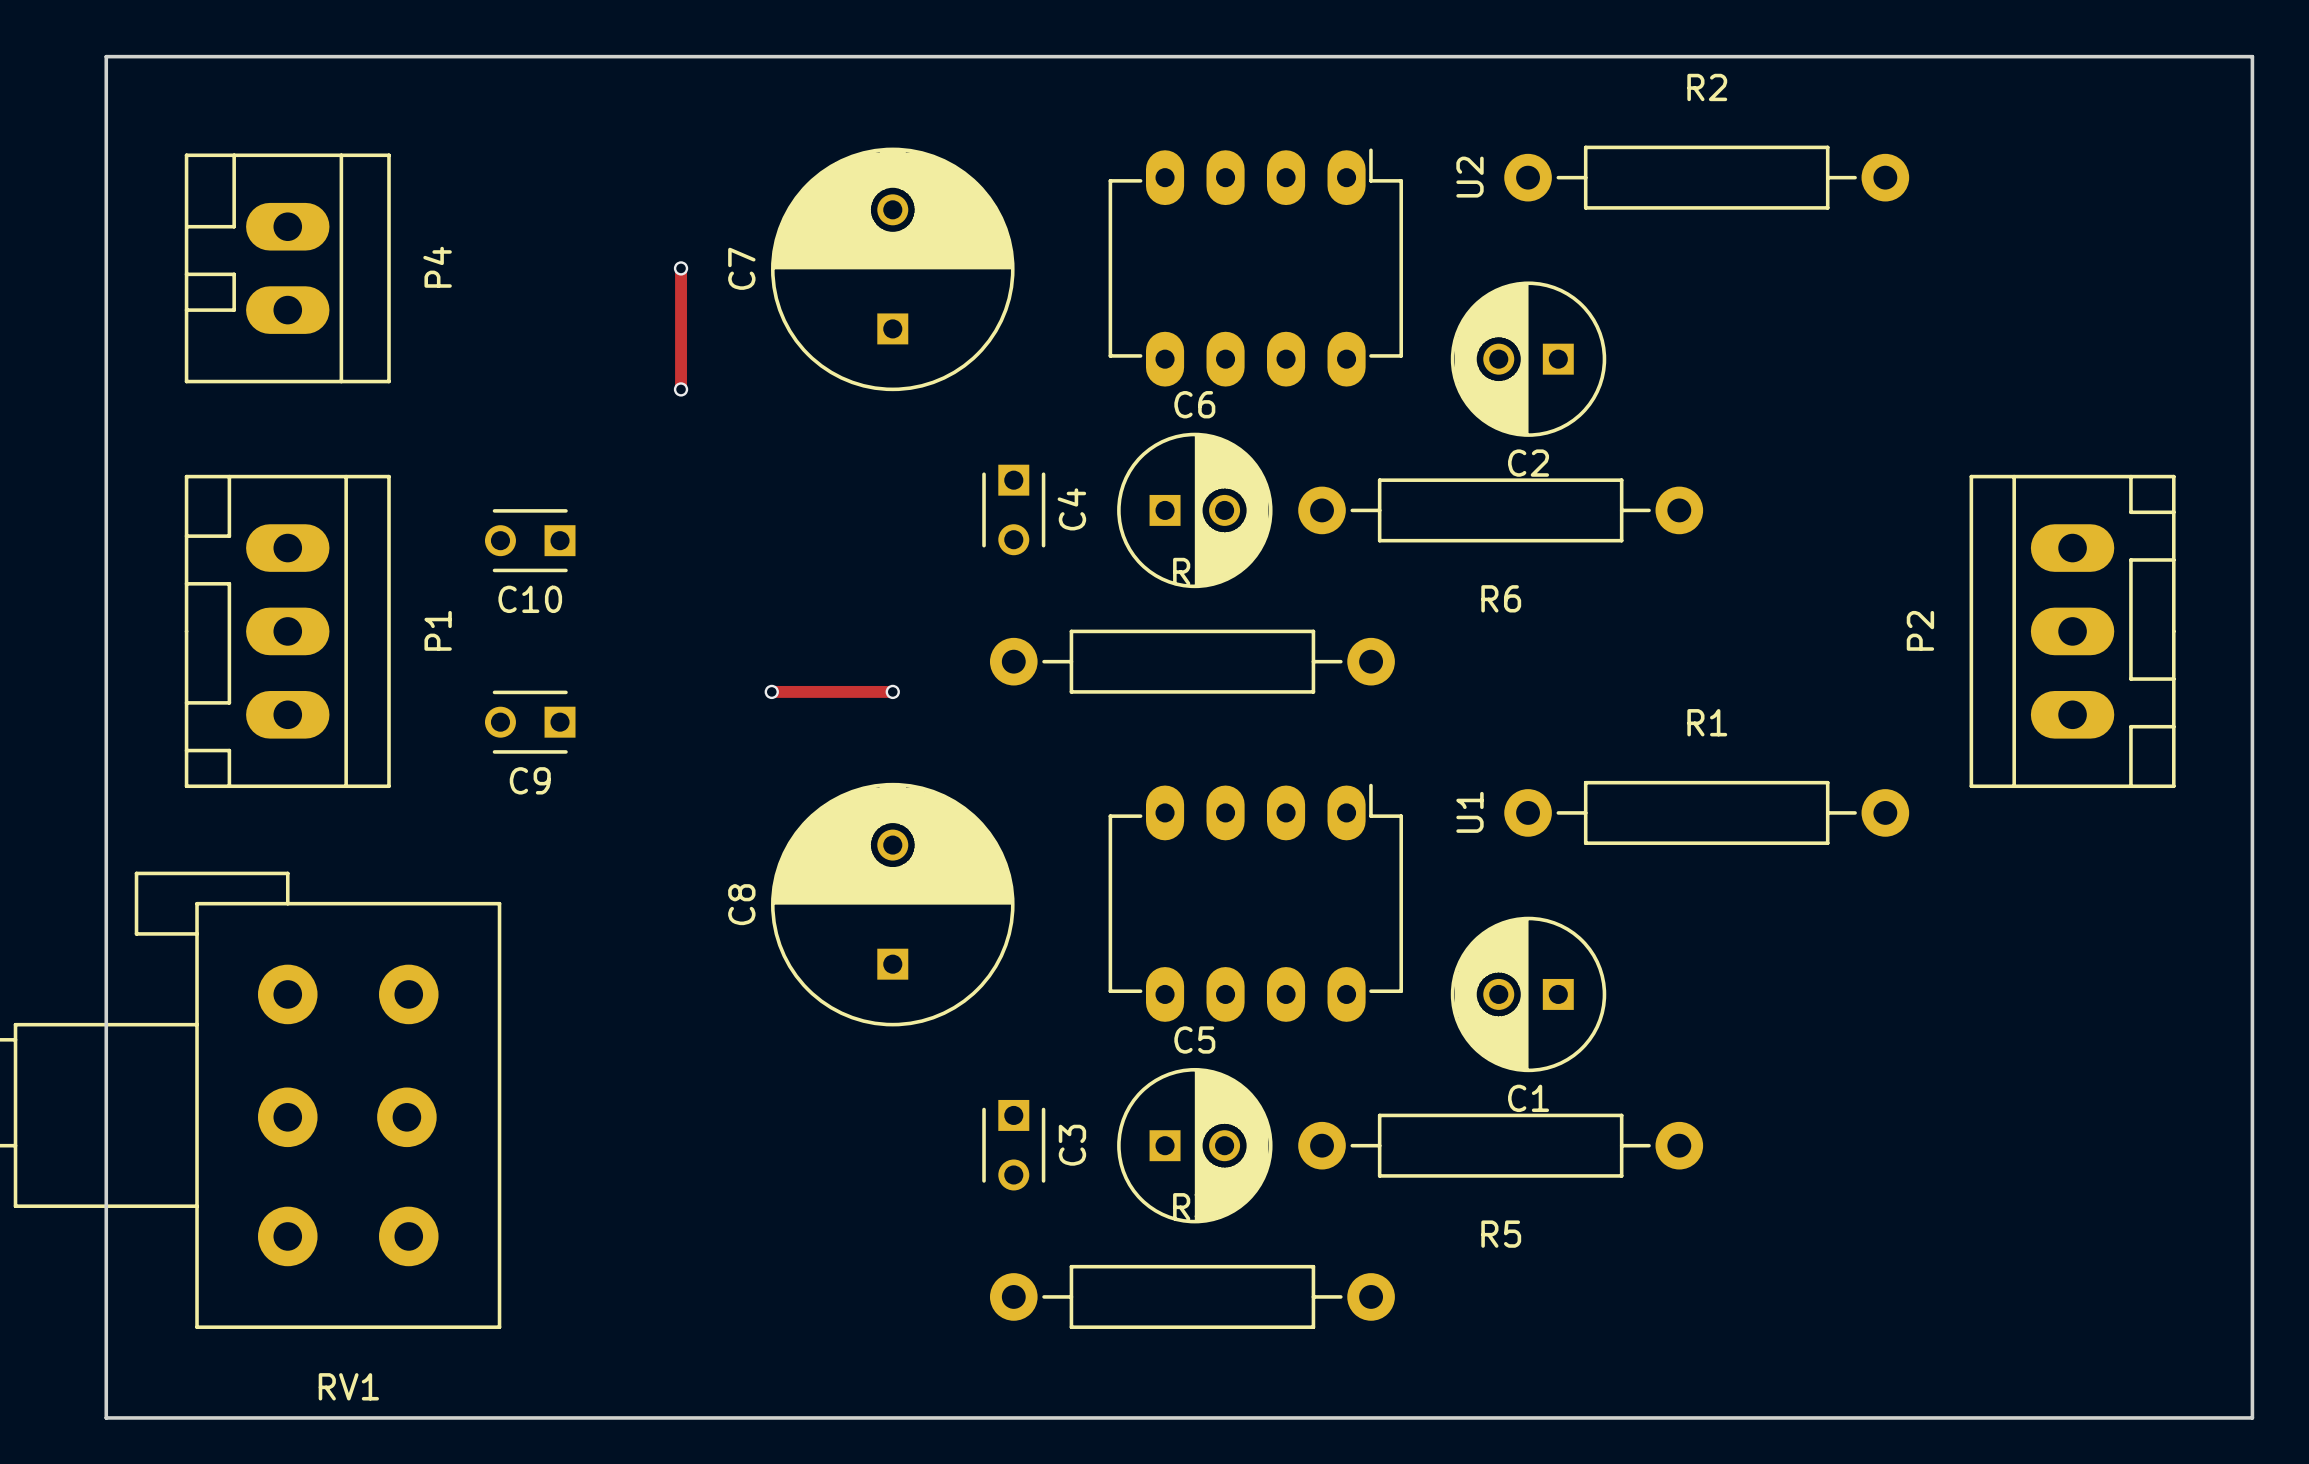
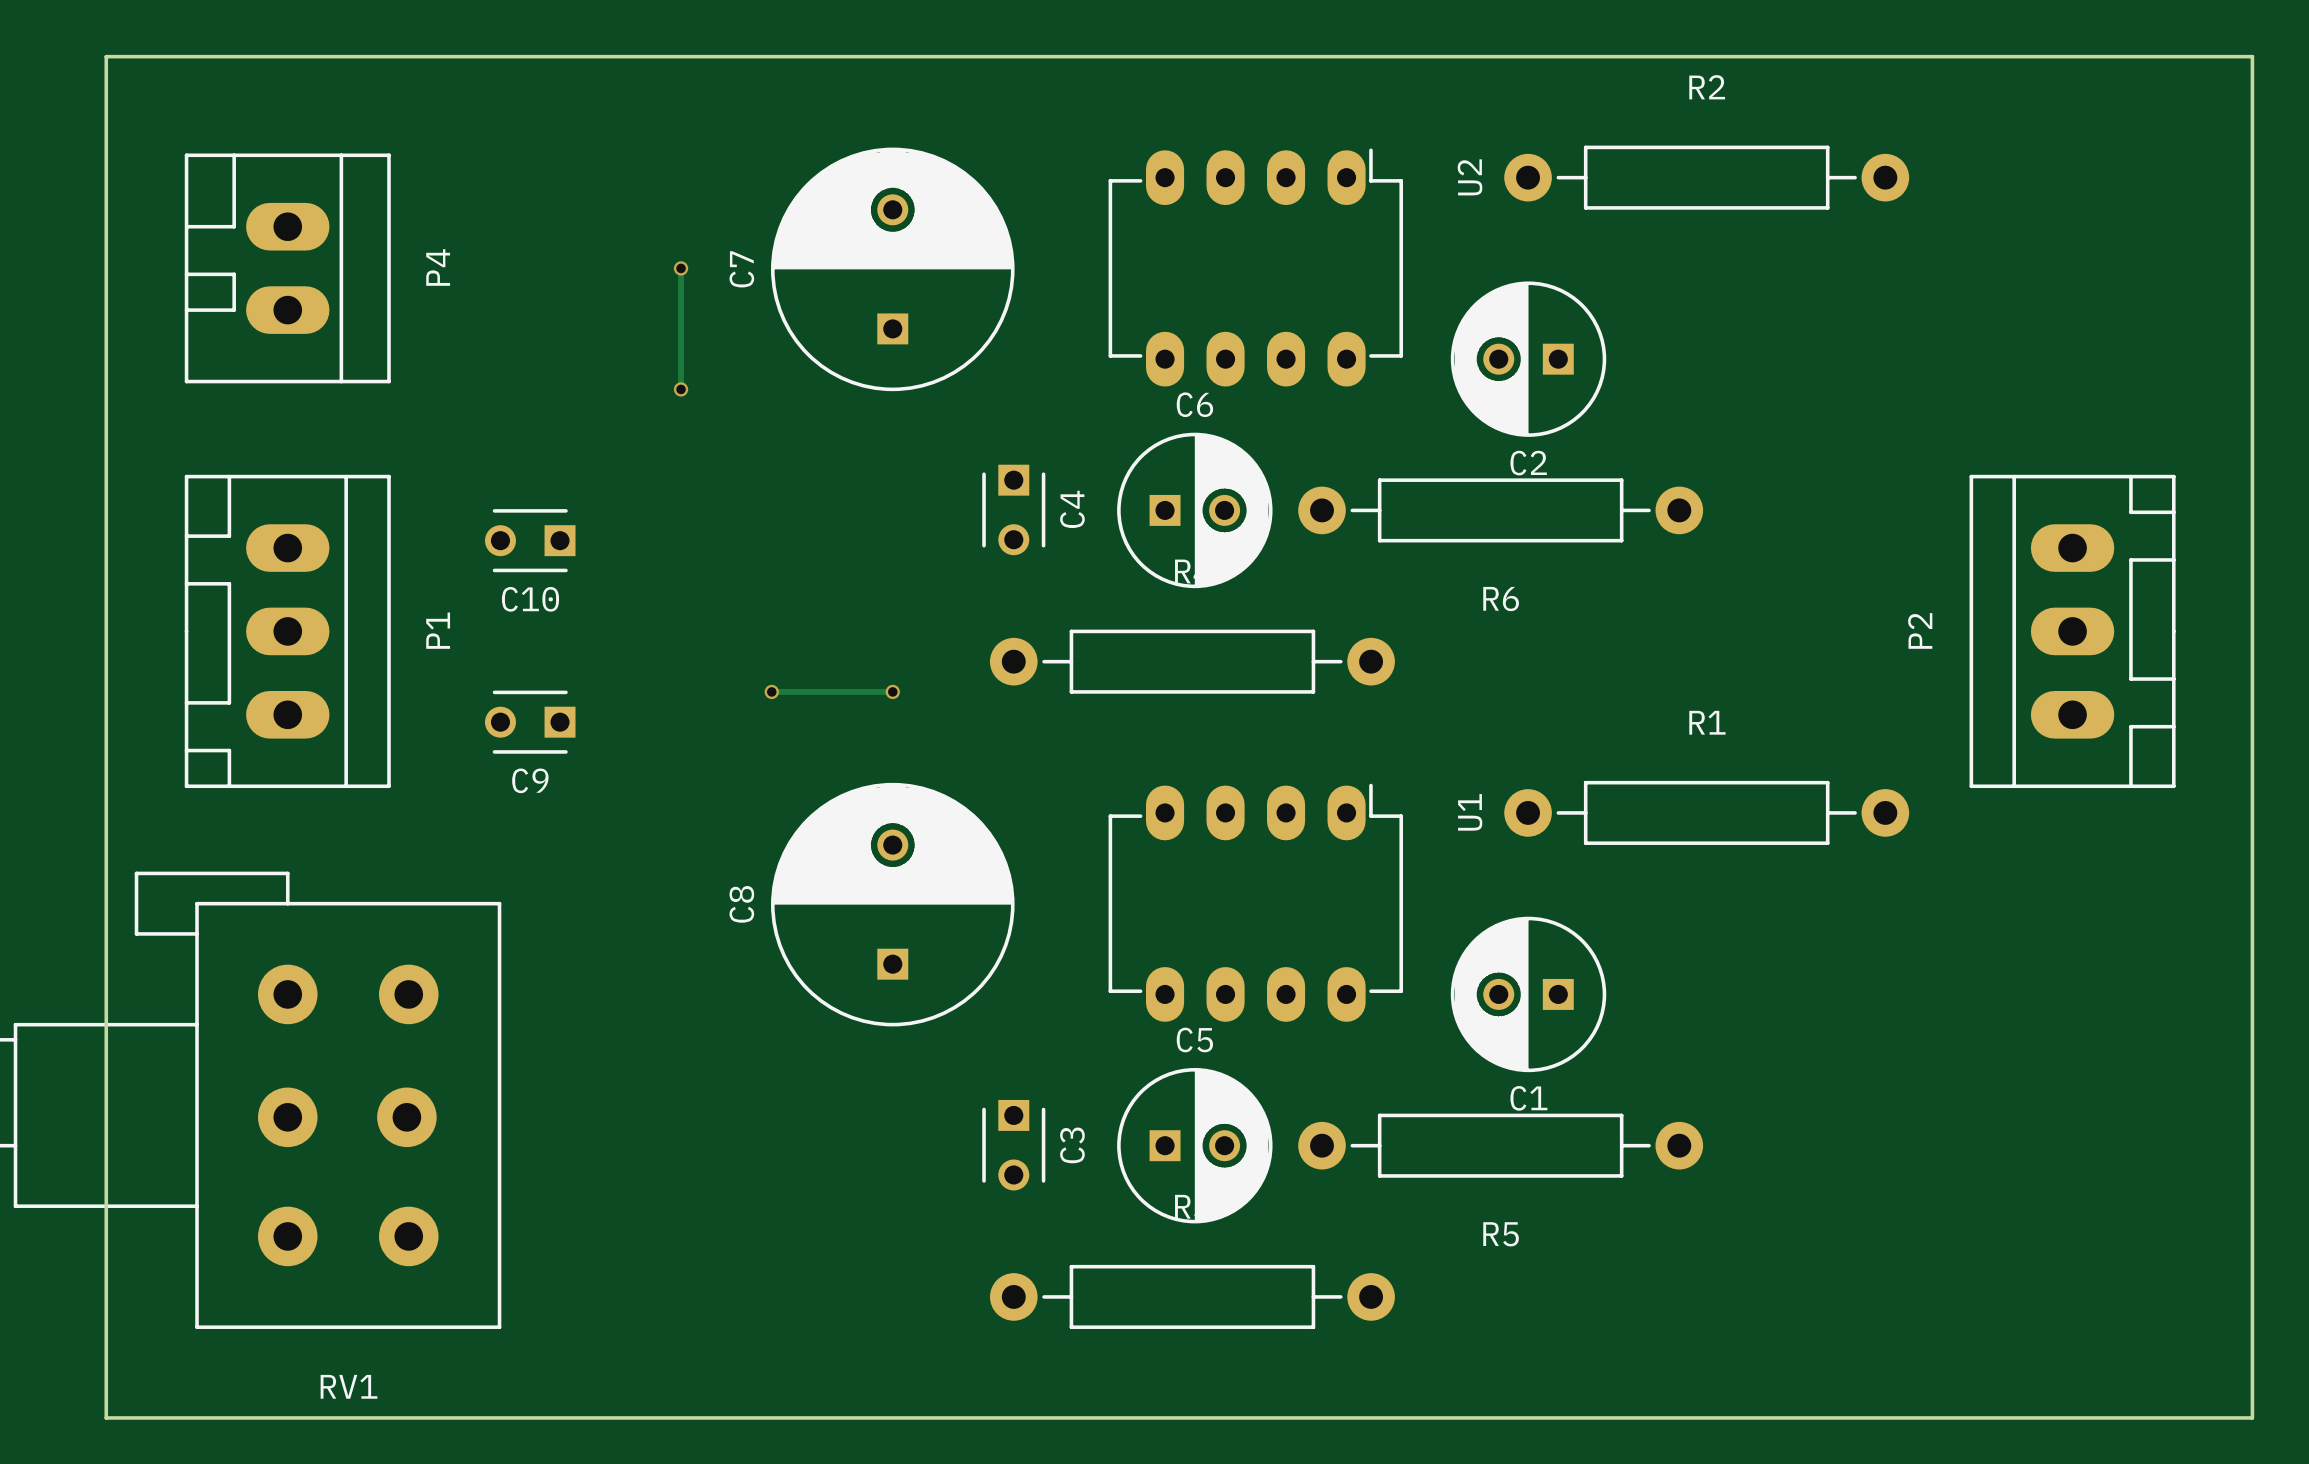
track width: thick (681, 268) (681, 389) -> thin (681, 268) (681, 389)
track width: thick (771, 691) (892, 691) -> thin (771, 691) (892, 691)

